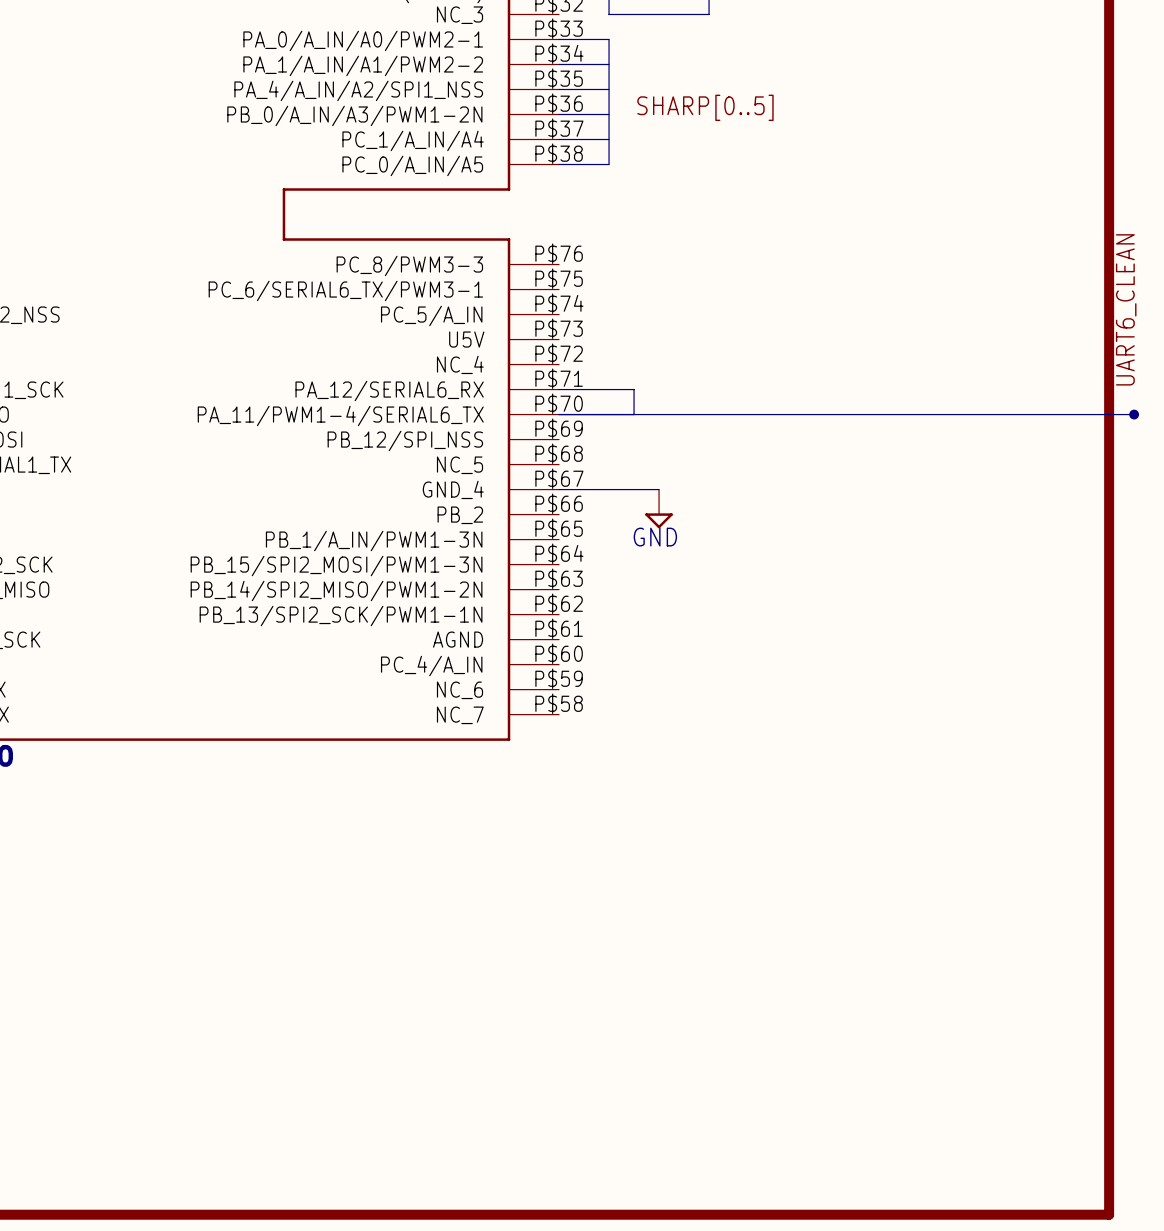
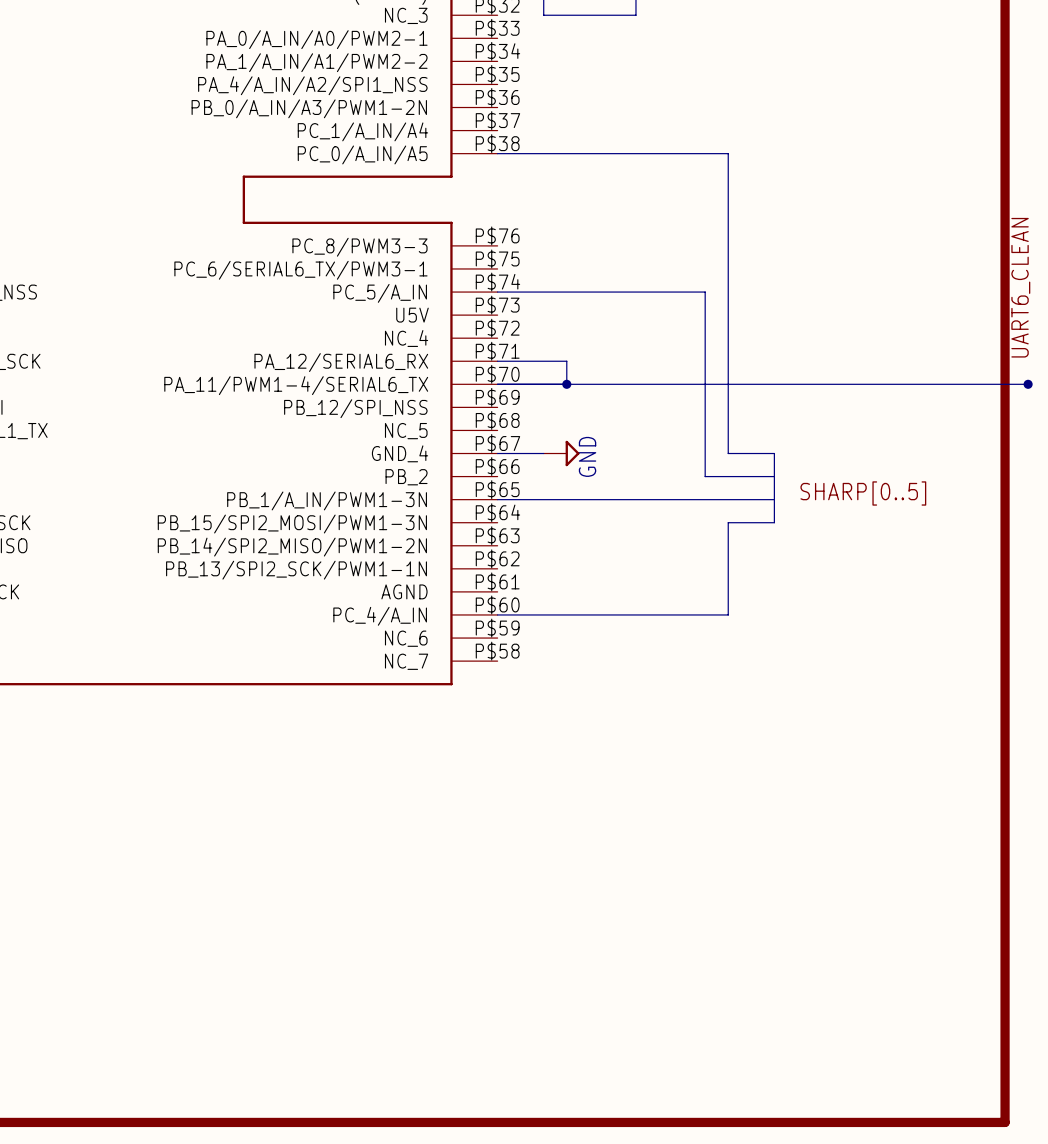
wire: (559, 39) (609, 39) -> none
bus: (609, 39) (609, 164) -> none
wire: (559, 64) (609, 64) -> none
wire: (559, 89) (609, 89) -> none
label: SHARP[0..5] (705, 107) -> none
wire: (559, 114) (609, 114) -> none
wire: (559, 139) (609, 139) -> none
wire: none -> (543, 153) (728, 153) (728, 453) (774, 453)
wire: none -> (497, 292) (705, 292) (705, 476) (774, 476)
junction: none -> (566, 384)
bus: none -> (774, 453) (774, 522)
power symbol position: GND (659, 508) -> GND (561, 453)
power symbol rotation: 0° (659, 520) -> 90° counterclockwise (572, 453)
label: none -> SHARP[0..5] (863, 493)
wire: none -> (497, 499) (774, 499)
wire: none -> (774, 522) (728, 522) (728, 614) (497, 614)

